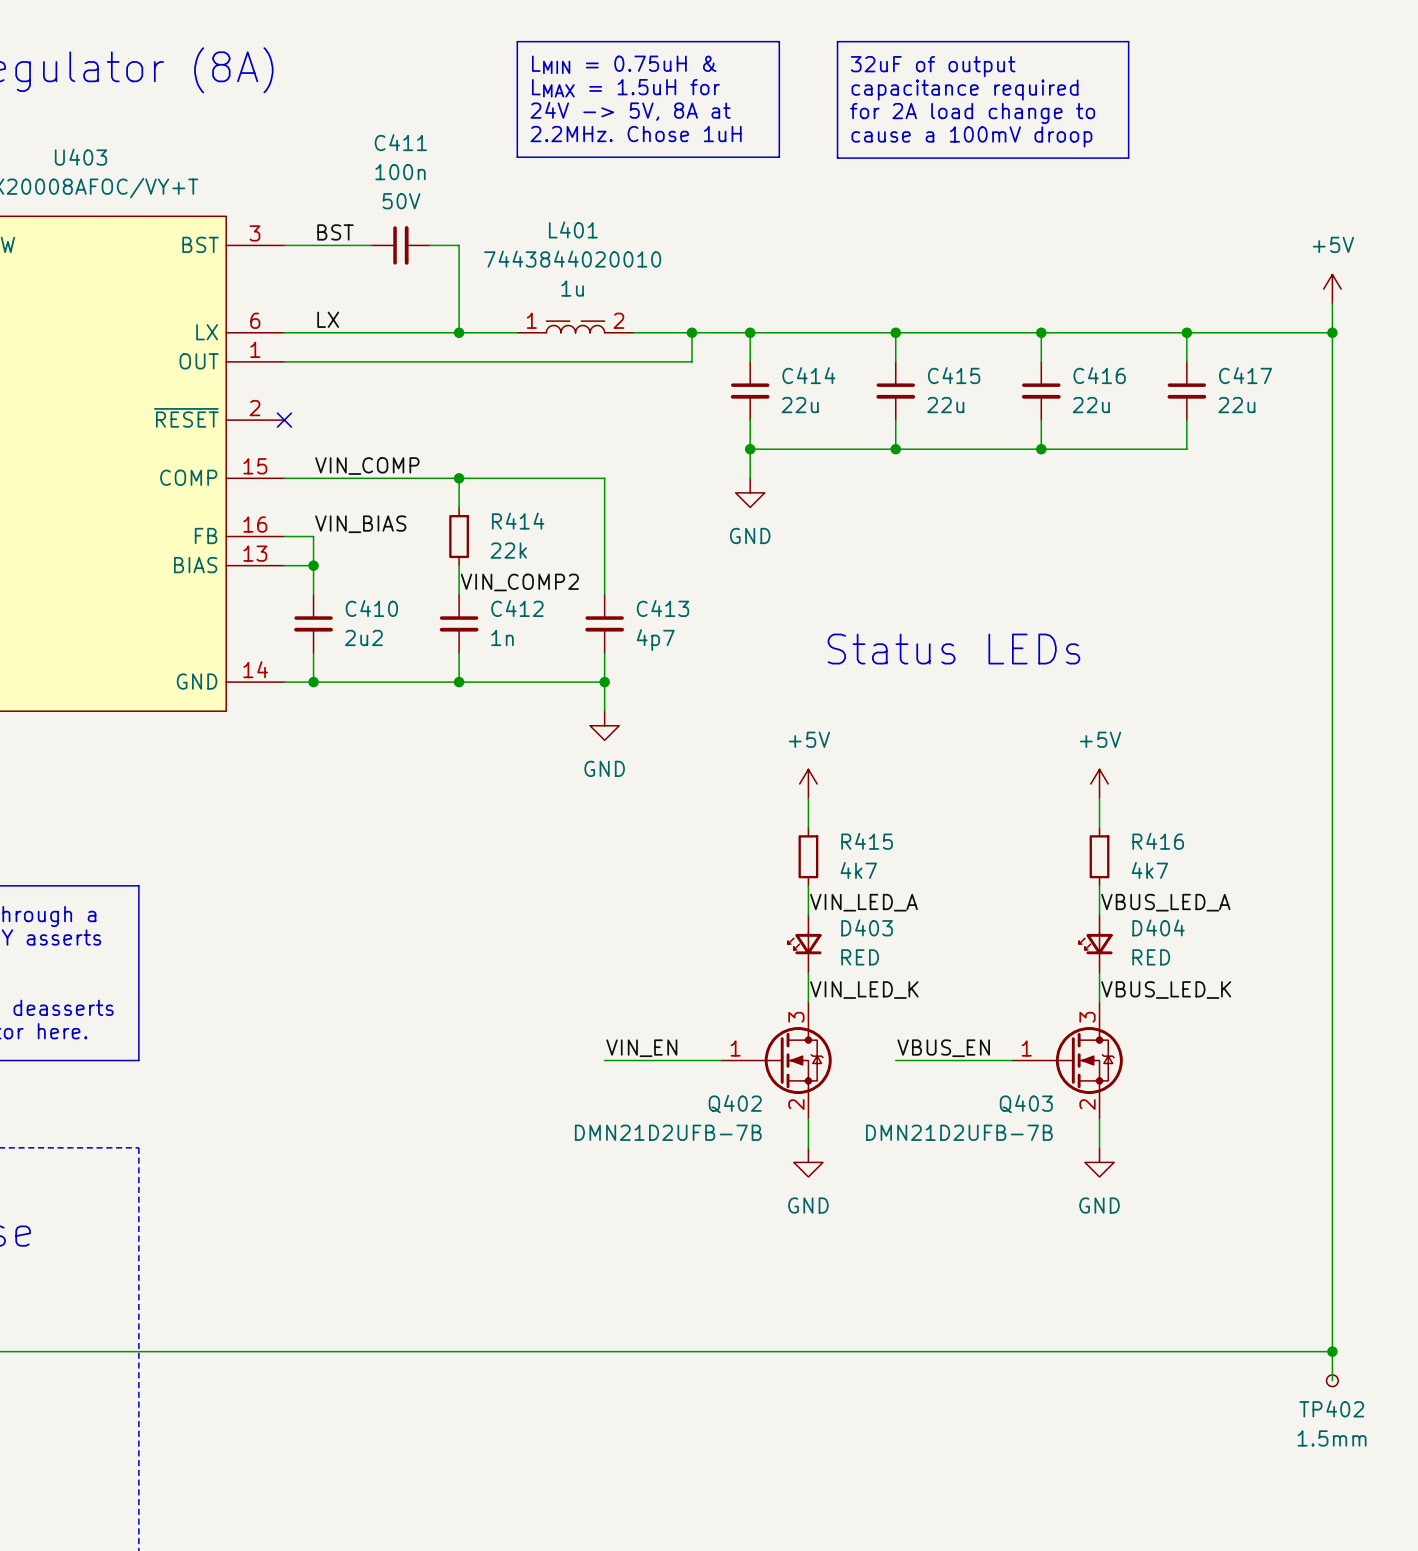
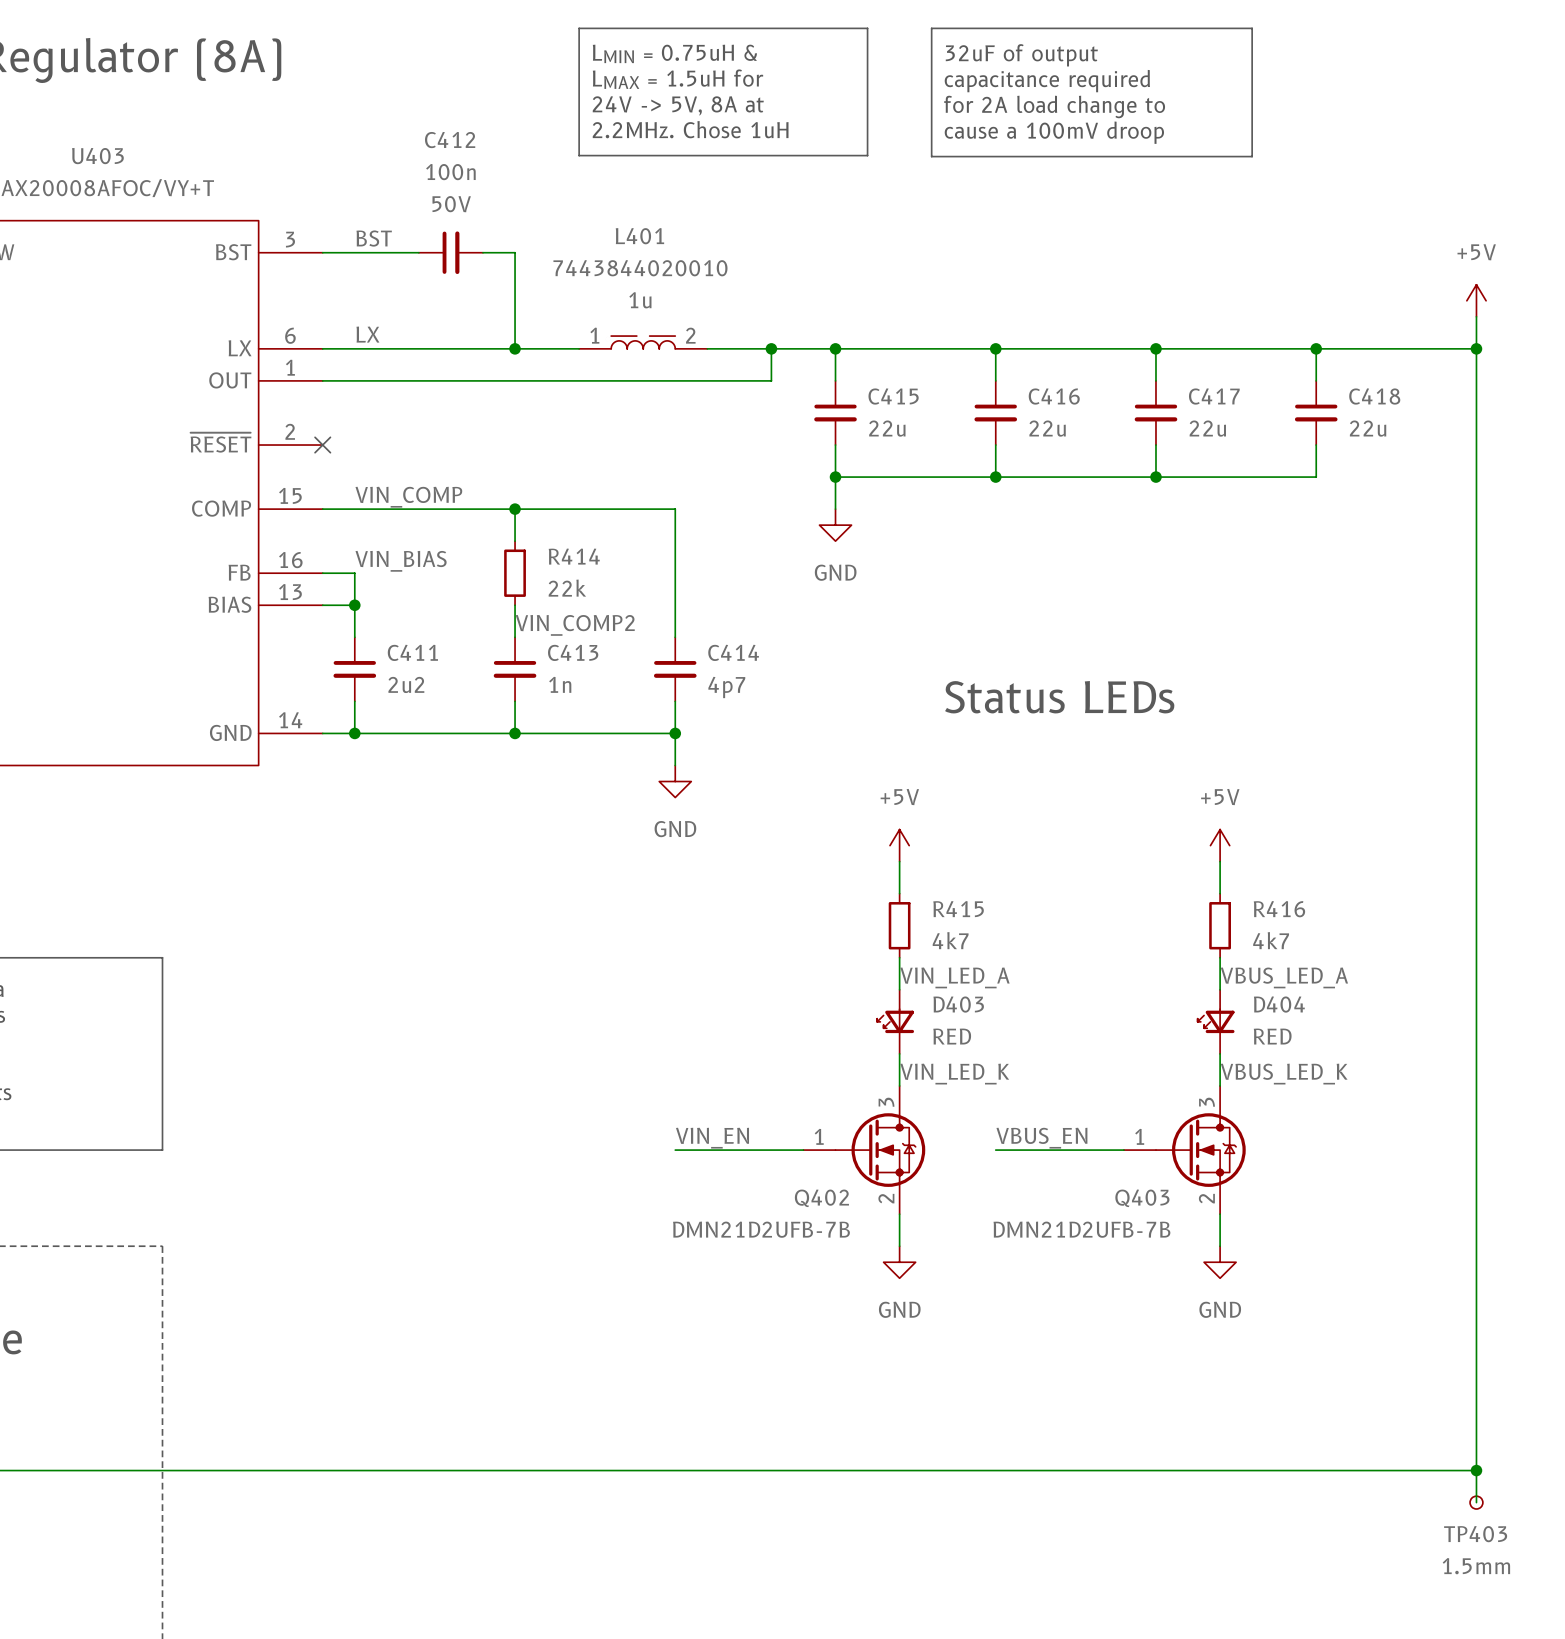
C411 name: C411 (400, 142) -> C412 (450, 140)
C414 name: C414 (808, 375) -> C415 (893, 396)
C415 name: C415 (954, 375) -> C416 (1054, 396)
C416 name: C416 (1099, 375) -> C417 (1214, 396)
C417 name: C417 (1245, 375) -> C418 (1374, 396)
C410 name: C410 (371, 608) -> C411 (412, 652)
C412 name: C412 (517, 608) -> C413 (573, 652)
C413 name: C413 (662, 608) -> C414 (733, 652)
TP402 name: TP402 (1331, 1408) -> TP403 (1475, 1534)

